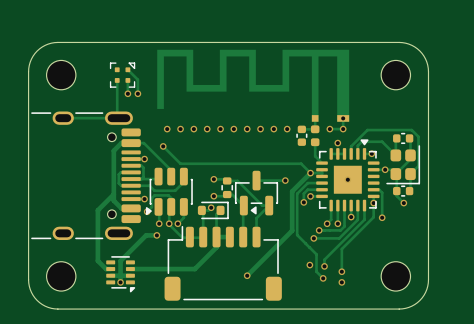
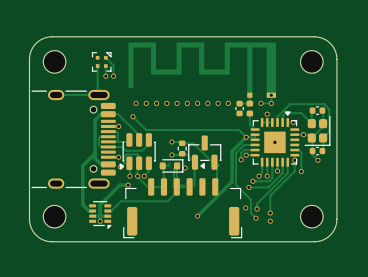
track: (237, 180) (262, 205) (269, 205) (256, 218) (256, 237) -> (190, 143) (193, 143) (215, 165) (218, 165) (215, 186)
track: (285, 180) (256, 180) -> none
via: (285, 180) -> none
via position: (211, 207) -> (185, 167)
part footprint: [164, 225, 282, 301] -> [123, 178, 243, 239]
track: (216, 237) (216, 247) (194, 269) (134, 269) -> (177, 169) (176, 192) (167, 201) (120, 201) (111, 211)

